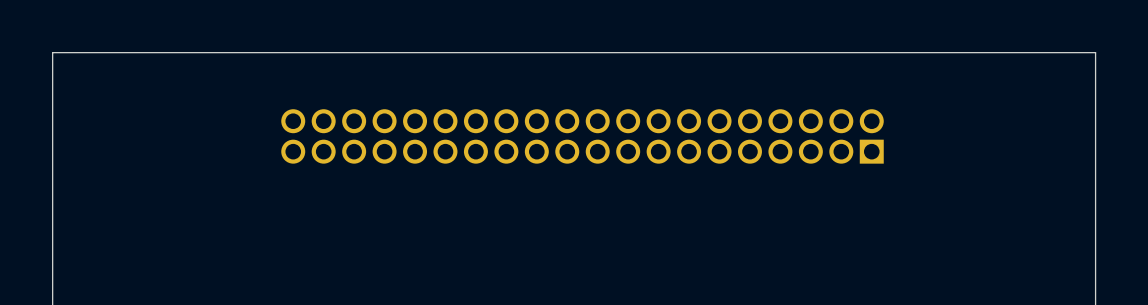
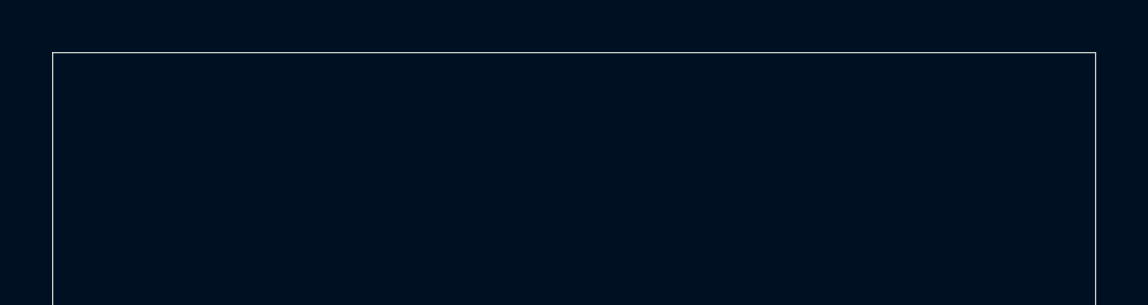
part: (582, 136) -> none

